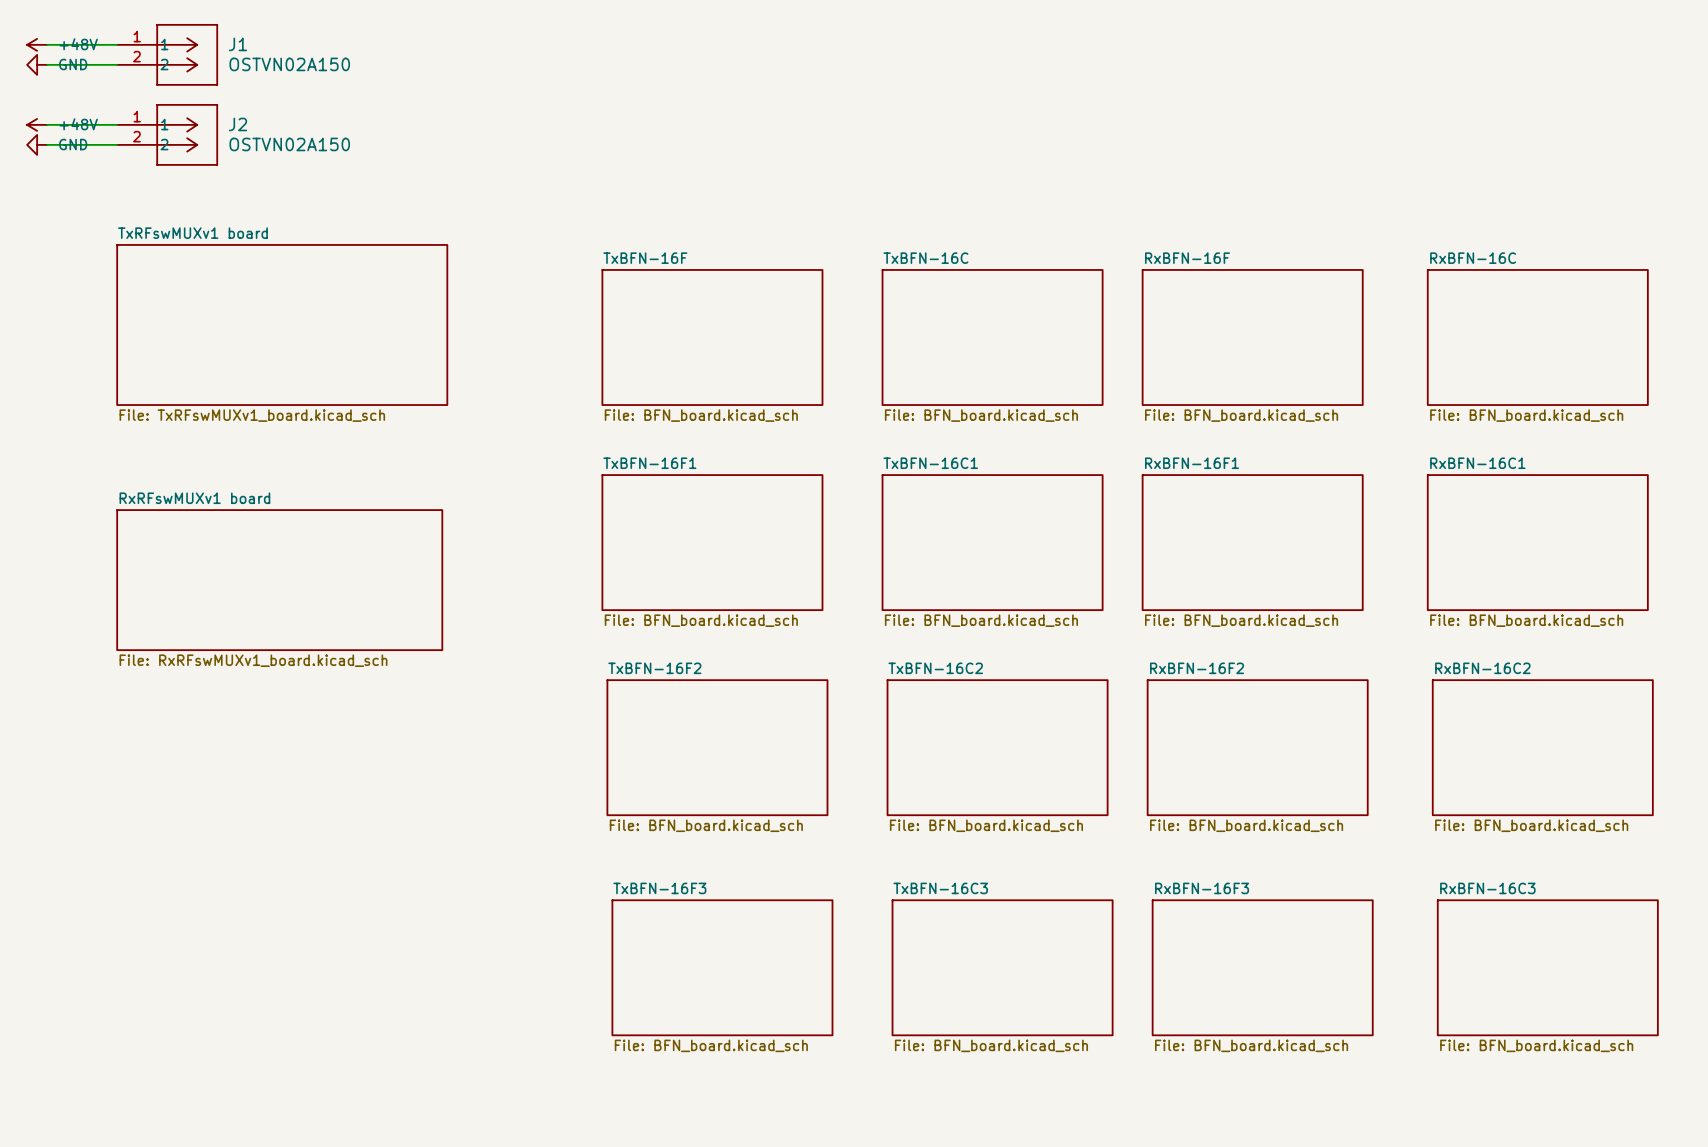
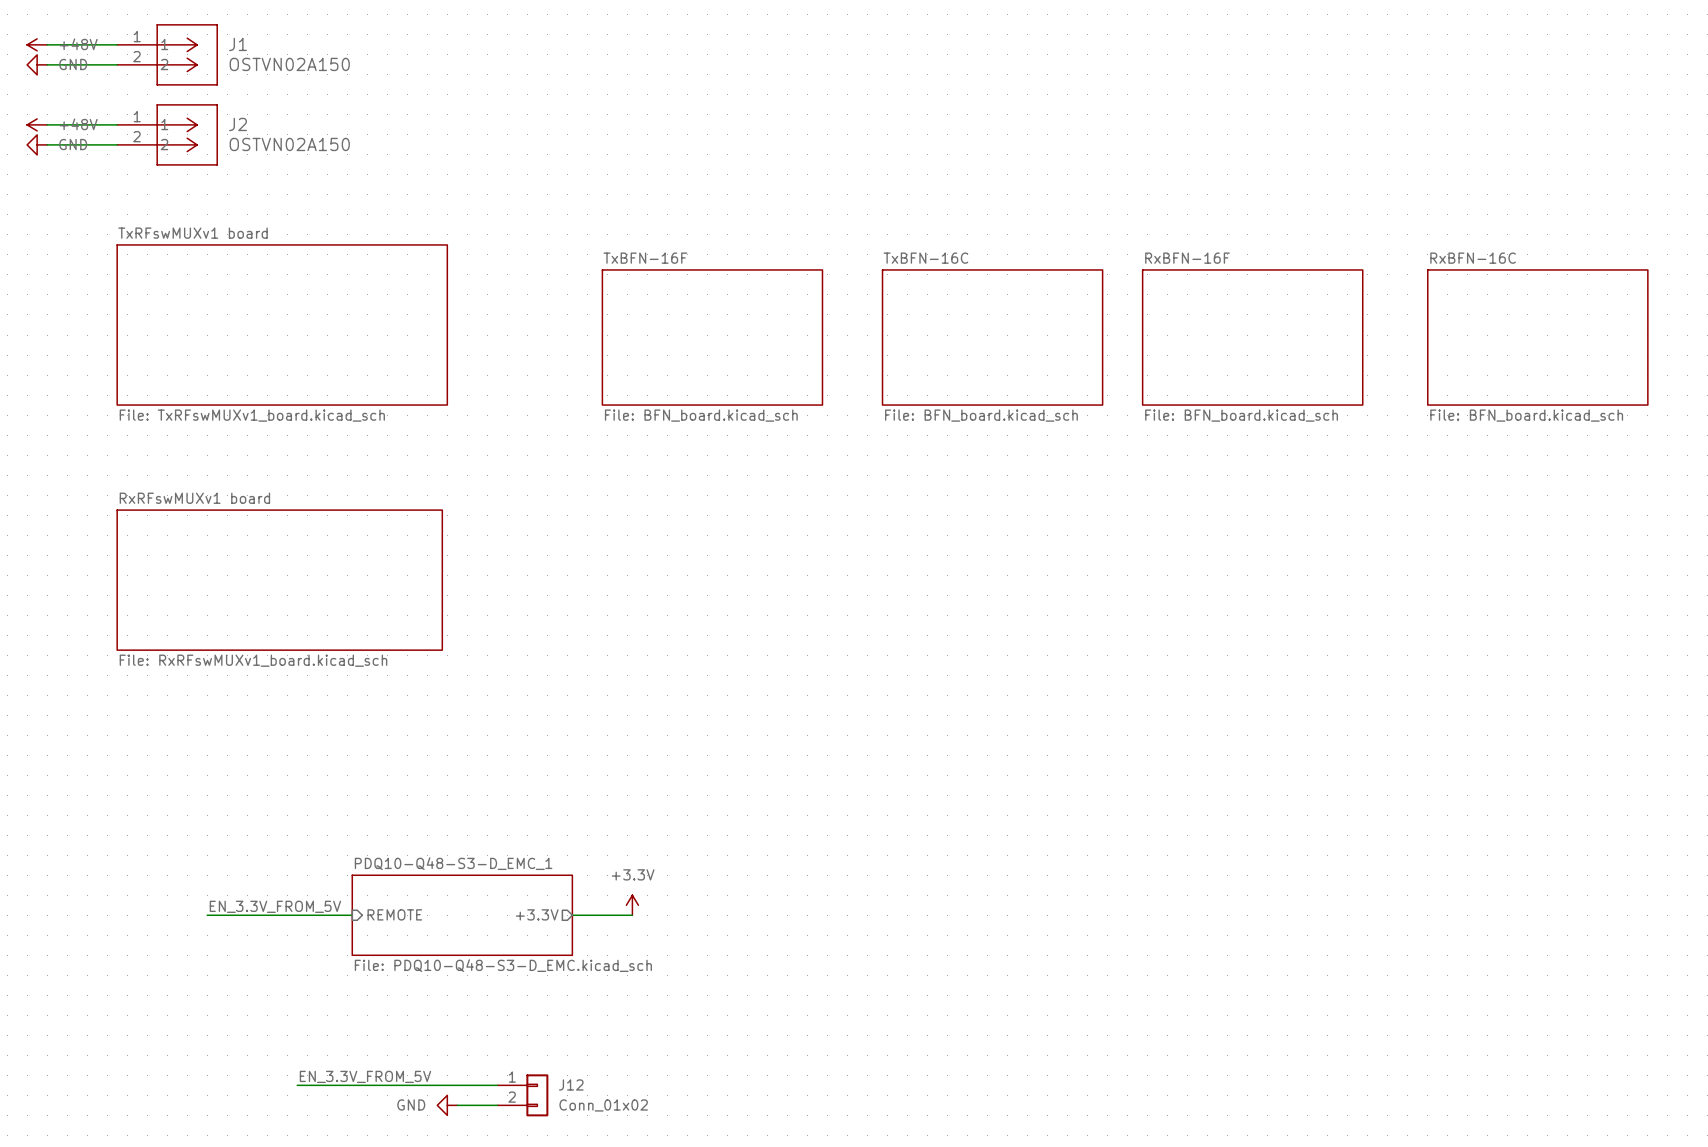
sheet TxBFN-16F1: File: BFN_board.kicad_sch (712, 542) -> none
sheet TxBFN-16C1: File: BFN_board.kicad_sch (992, 542) -> none
sheet RxBFN-16F1: File: BFN_board.kicad_sch (1252, 542) -> none
sheet RxBFN-16C1: File: BFN_board.kicad_sch (1537, 542) -> none
sheet TxBFN-16F2: File: BFN_board.kicad_sch (717, 747) -> none
sheet TxBFN-16C2: File: BFN_board.kicad_sch (997, 747) -> none
sheet RxBFN-16F2: File: BFN_board.kicad_sch (1257, 747) -> none
sheet RxBFN-16C2: File: BFN_board.kicad_sch (1542, 747) -> none
power symbol: none -> +3.3V (632, 905)
label: none -> EN_3.3V_FROM_5V (275, 906)
sheet pin: none -> REMOTE (394, 914)
sheet pin: none -> +3.3V (537, 914)
wire: none -> (207, 915) (352, 915)
sheet PDQ10-Q48-S3-D_EMC_1: none -> File: PDQ10-Q48-S3-D_EMC.kicad_sch (462, 915)
wire: none -> (572, 915) (632, 915)
sheet TxBFN-16F3: File: BFN_board.kicad_sch (722, 967) -> none
sheet TxBFN-16C3: File: BFN_board.kicad_sch (1002, 967) -> none
sheet RxBFN-16F3: File: BFN_board.kicad_sch (1262, 967) -> none
sheet RxBFN-16C3: File: BFN_board.kicad_sch (1547, 967) -> none
label: none -> EN_3.3V_FROM_5V (365, 1076)
wire: none -> (297, 1085) (497, 1085)
J12: none -> Conn_01x02 (522, 1095)
power symbol: none -> GND (447, 1105)
wire: none -> (457, 1105) (497, 1105)

